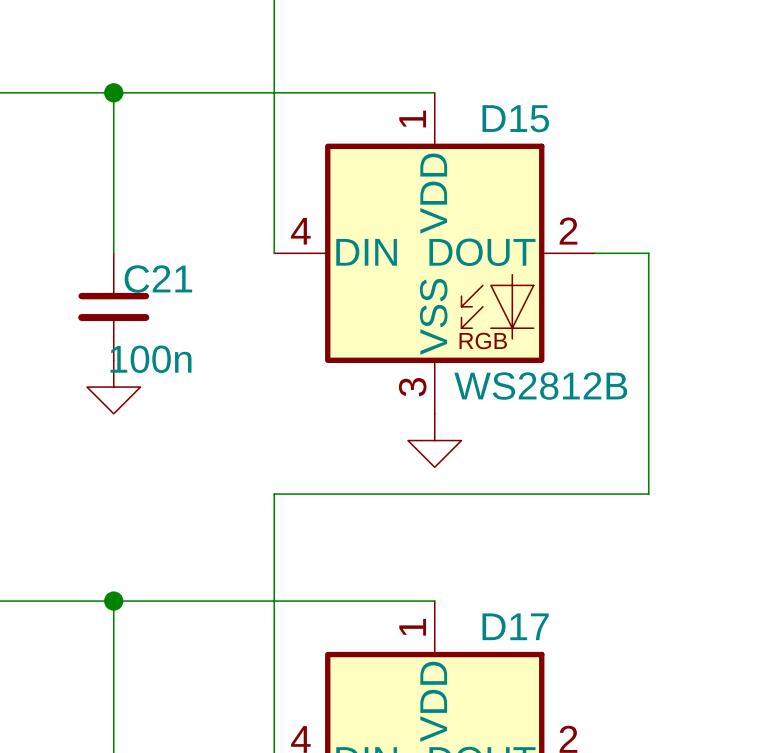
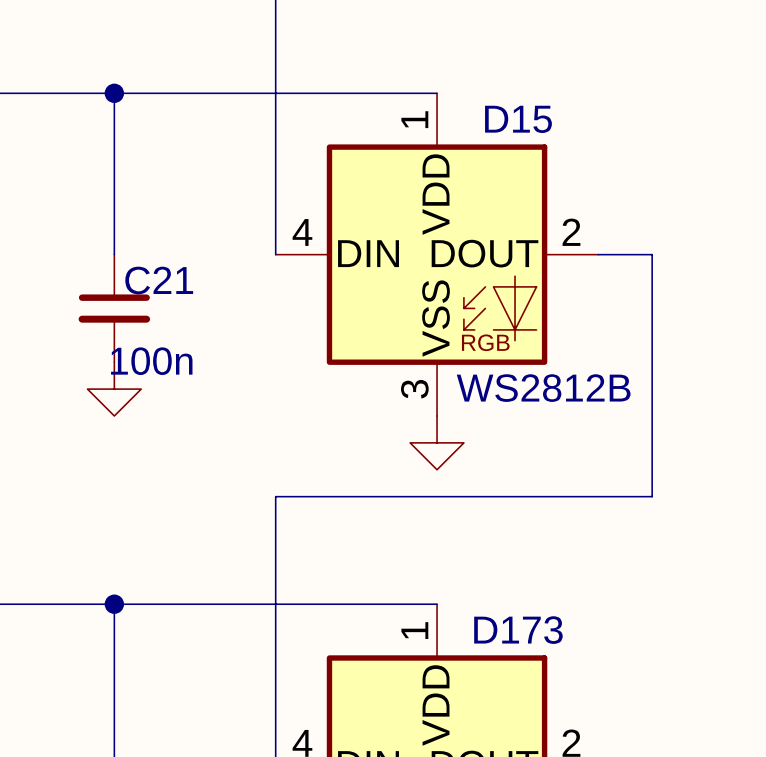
D17 name: D17 (515, 626) -> D173 (518, 630)

